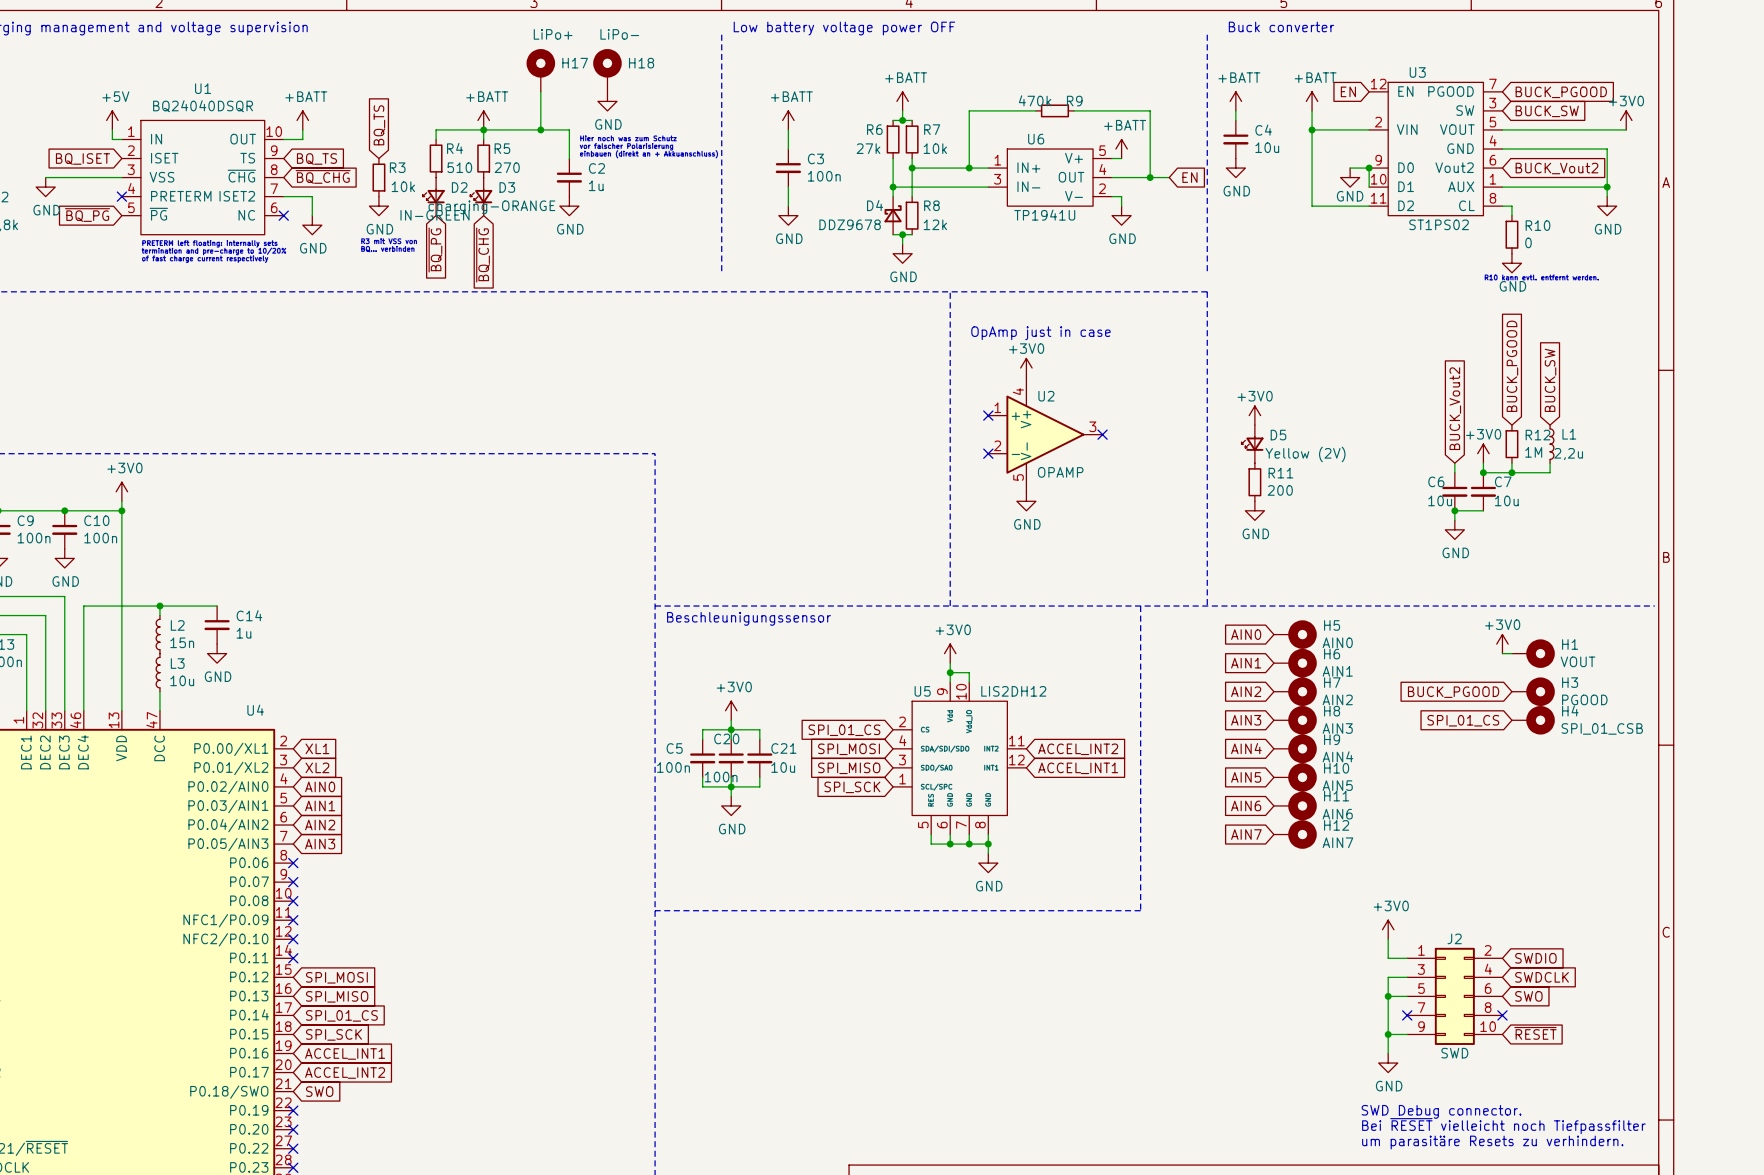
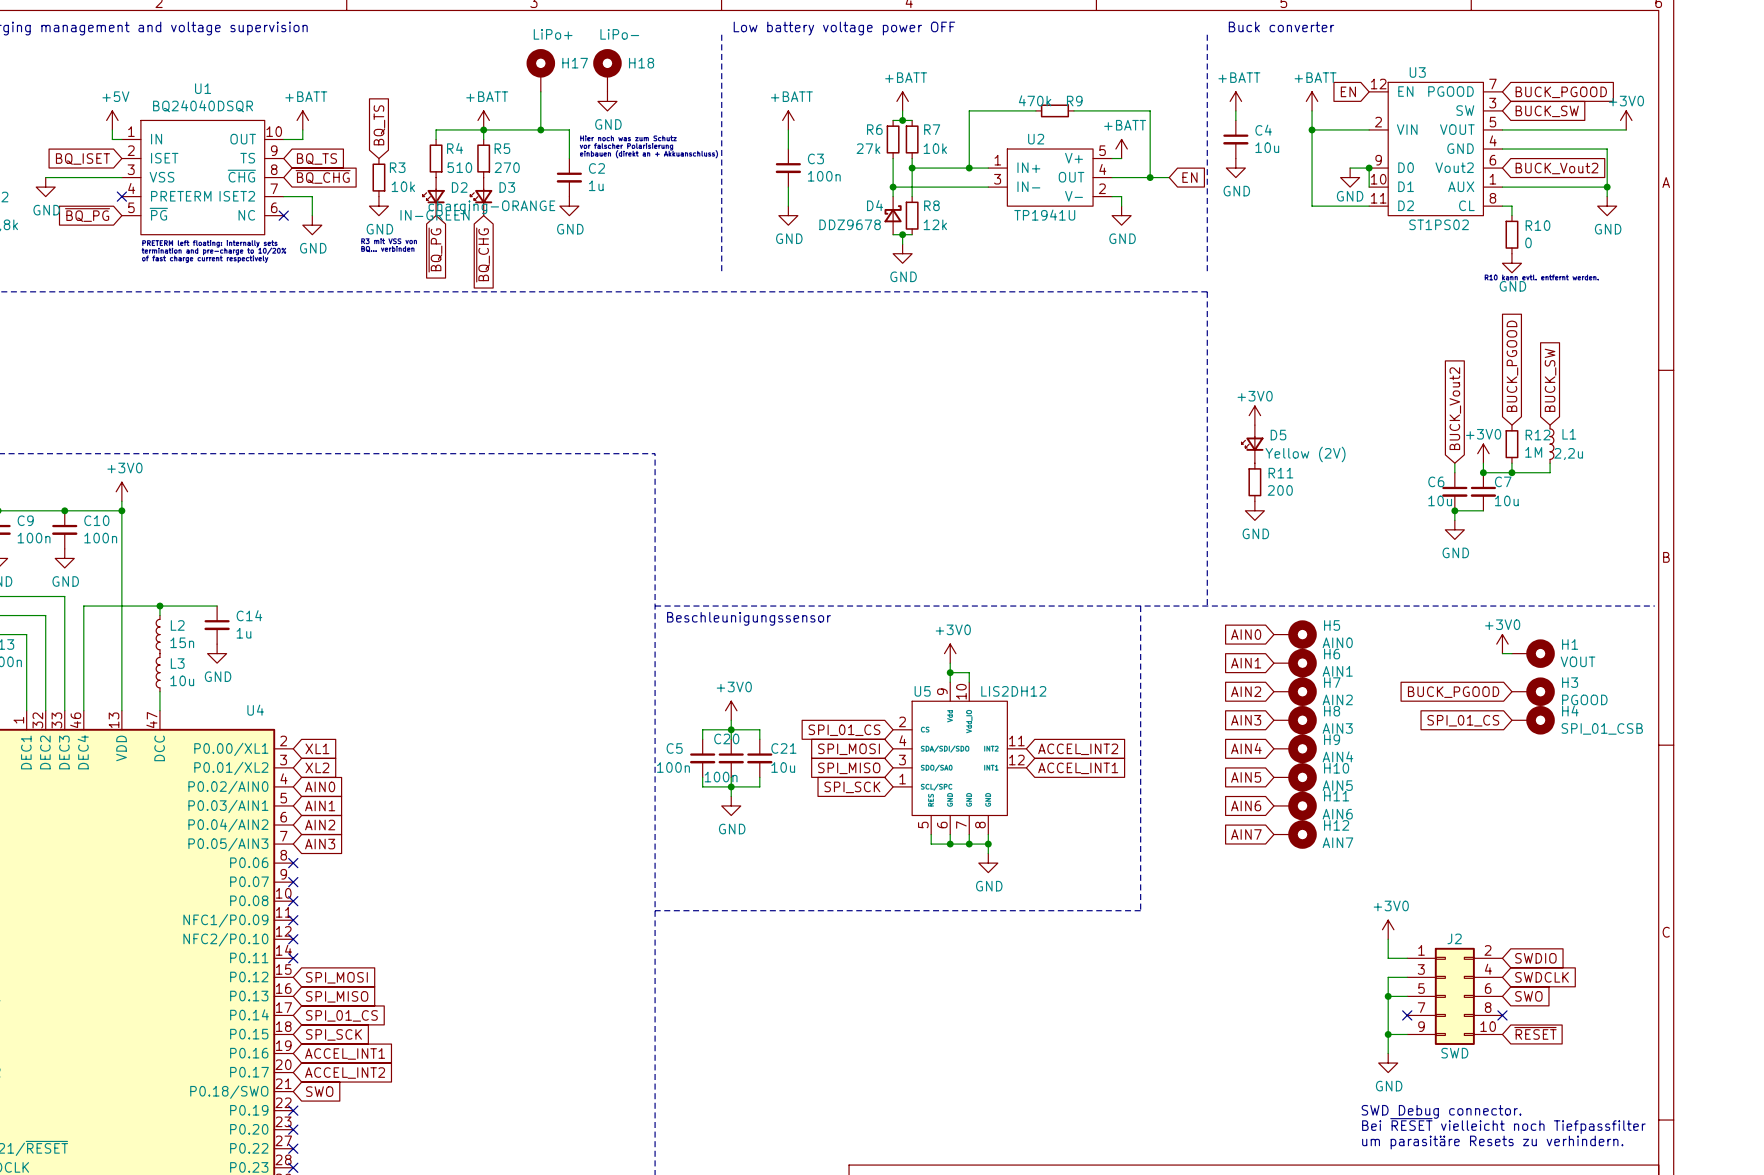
U6 name: U6 (1036, 139) -> U2 (1036, 139)
line: (950, 291) (950, 606) -> none
text: OpAmp just in case (1040, 333) -> none
power symbol: +3V0 (1026, 367) -> none
no-connect mark: (988, 415) -> none
U2: OPAMP (1045, 434) -> none
no-connect mark: (1102, 434) -> none
no-connect mark: (988, 453) -> none
power symbol: GND (1026, 501) -> none

